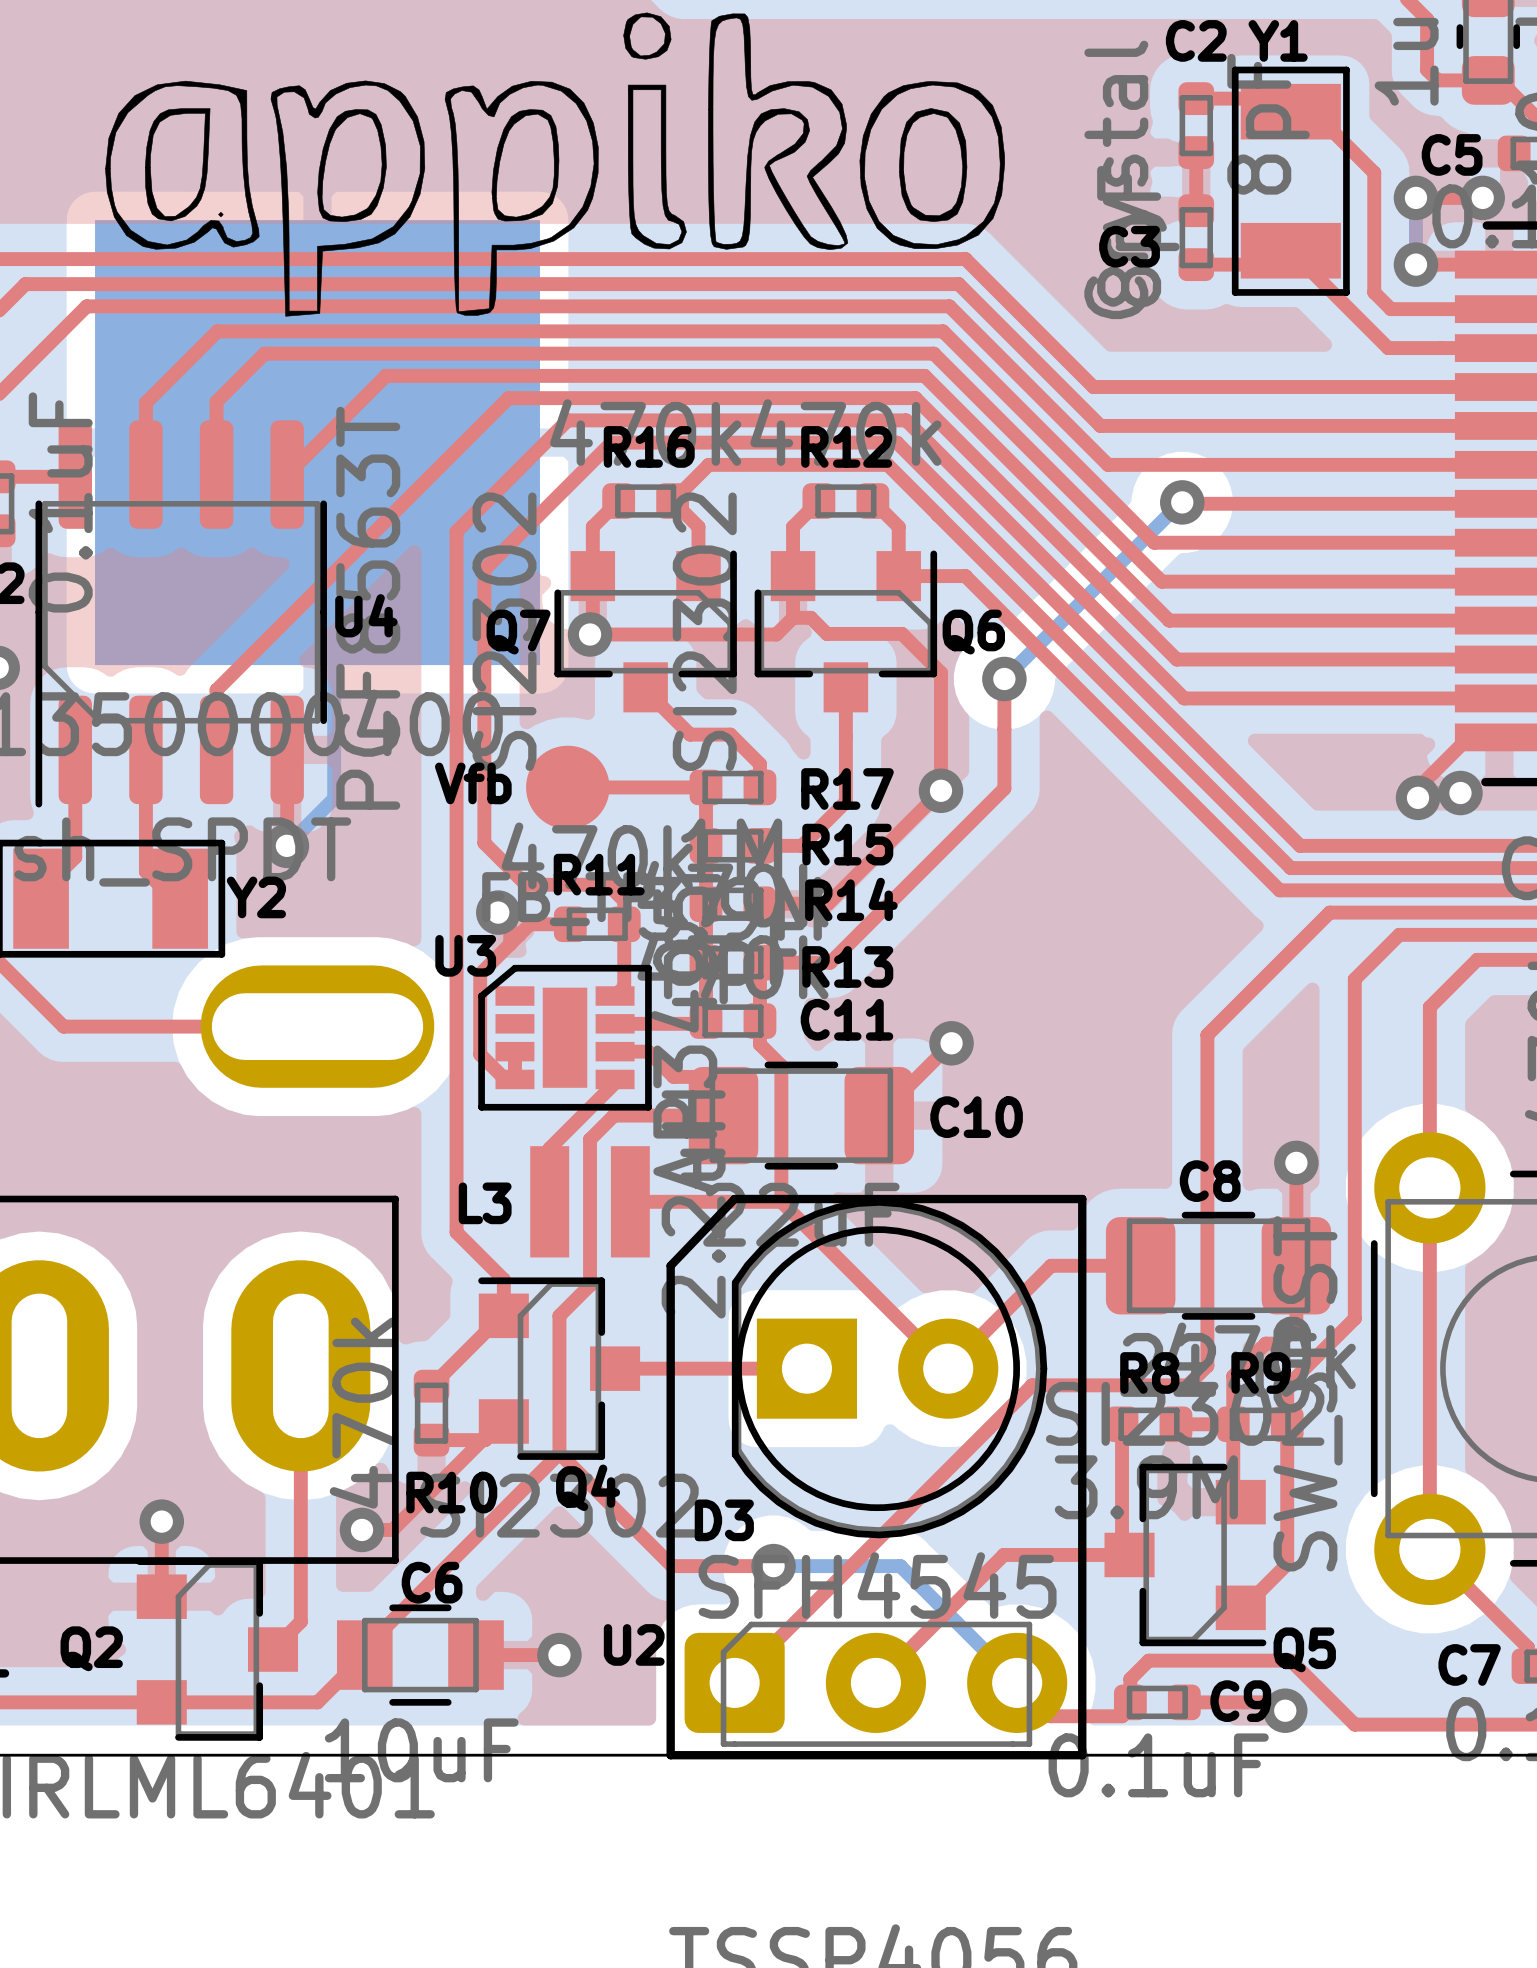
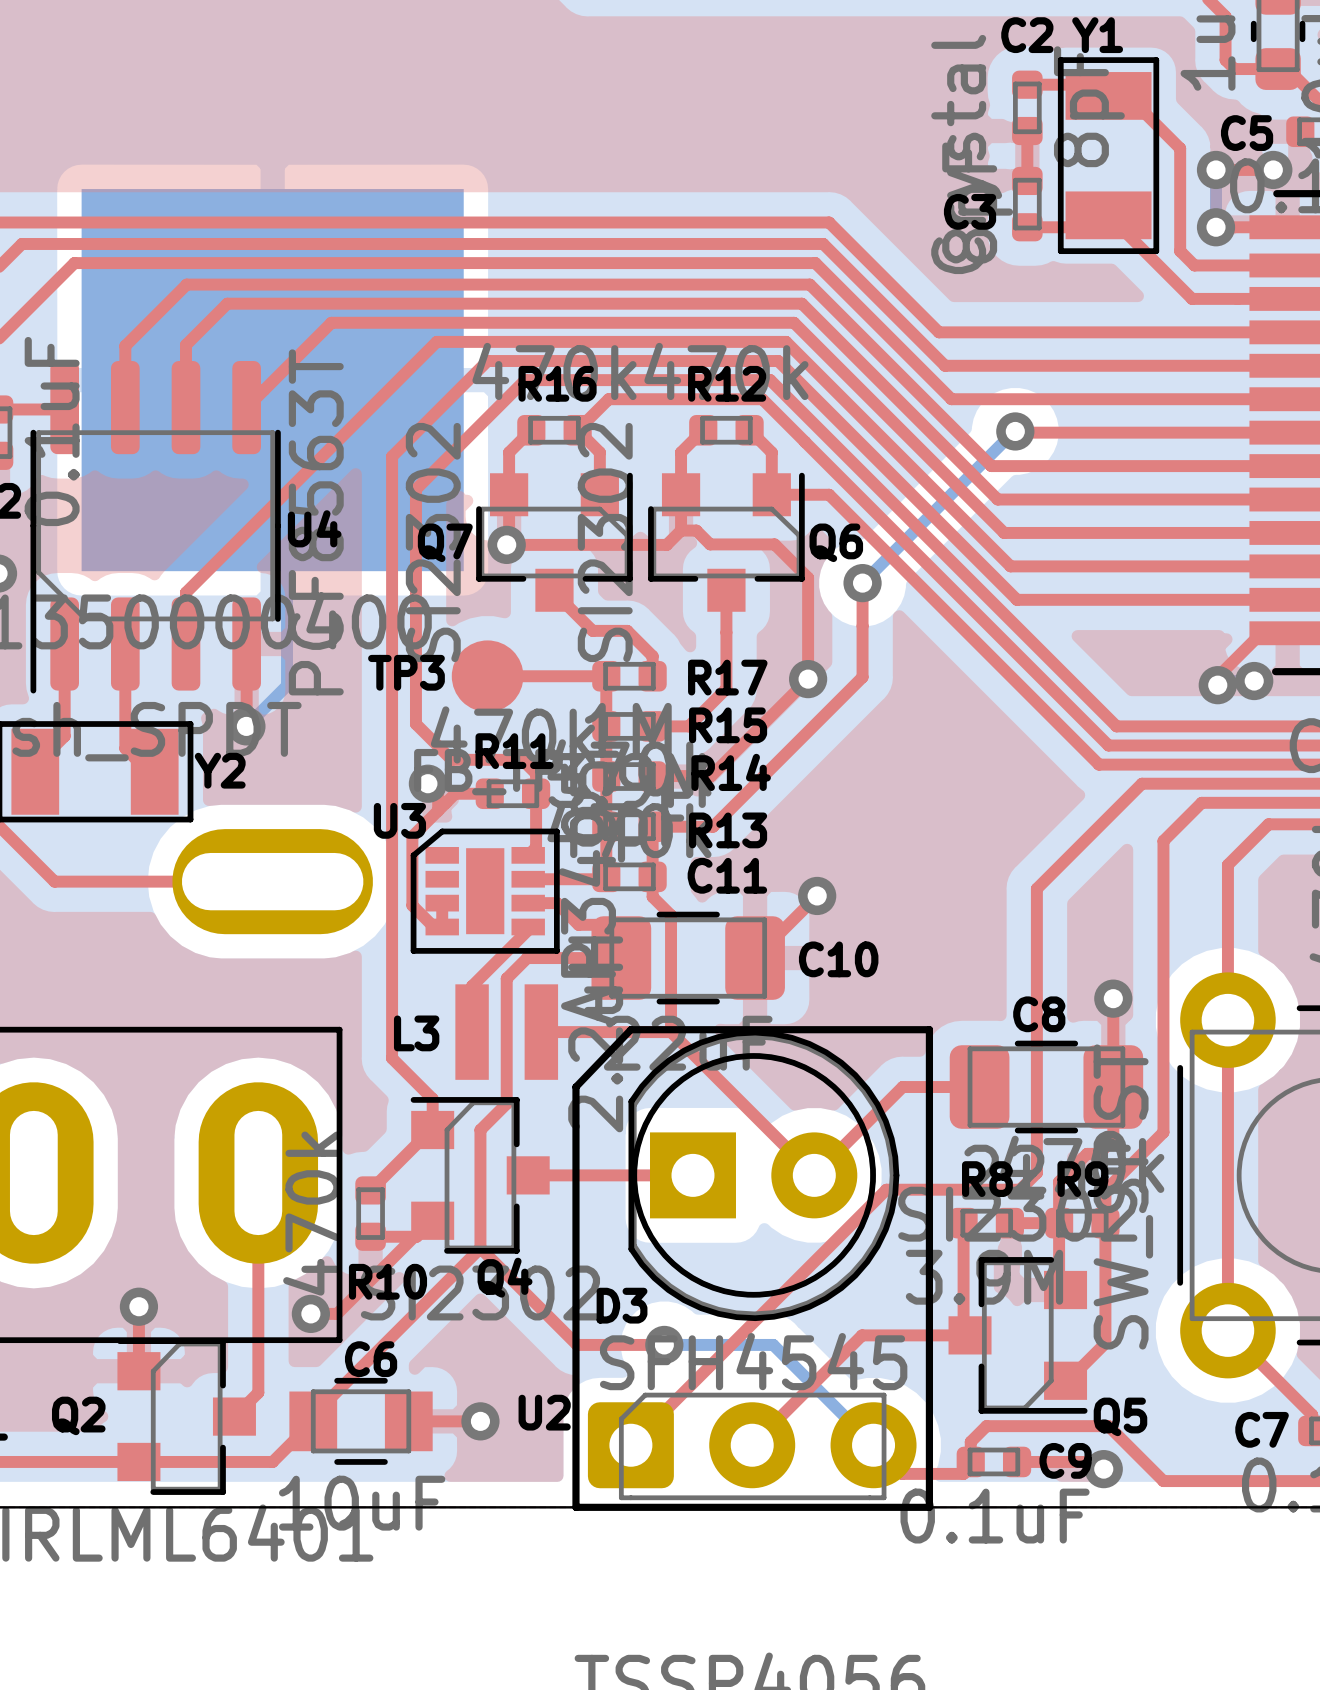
drawing: [105, 12, 1006, 317] -> none
Vfb name: Vfb (473, 783) -> TP3 (406, 672)

